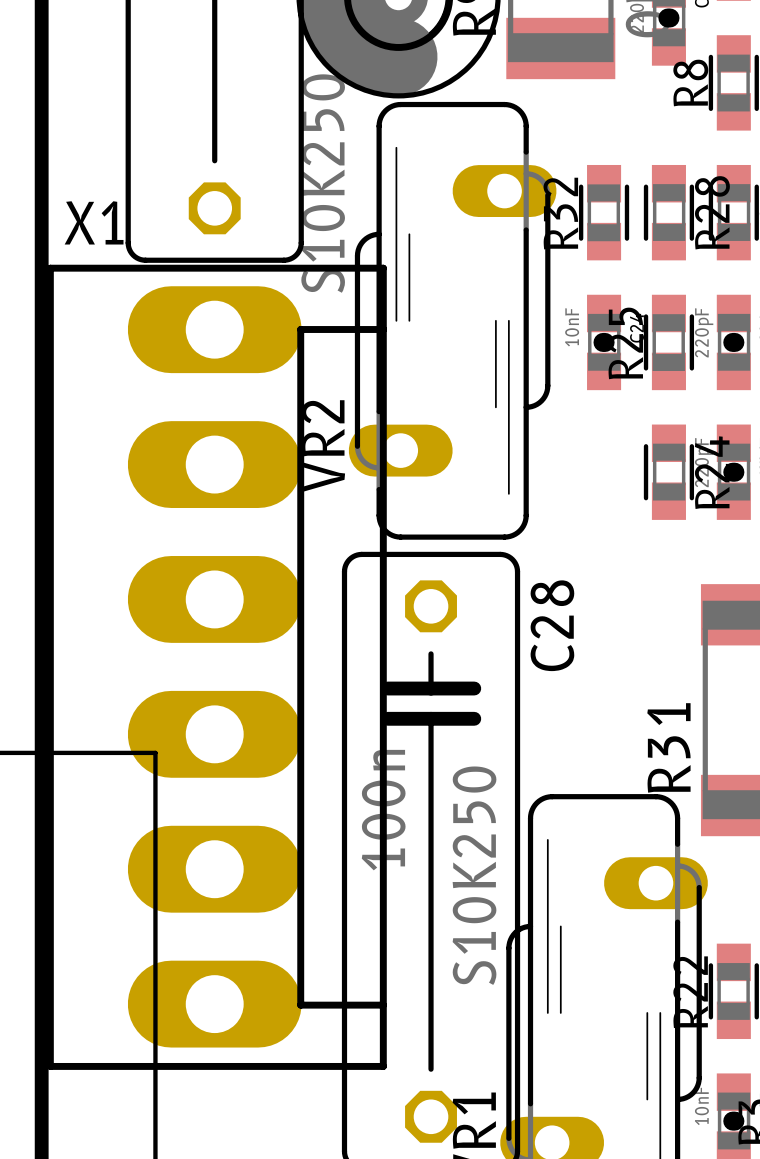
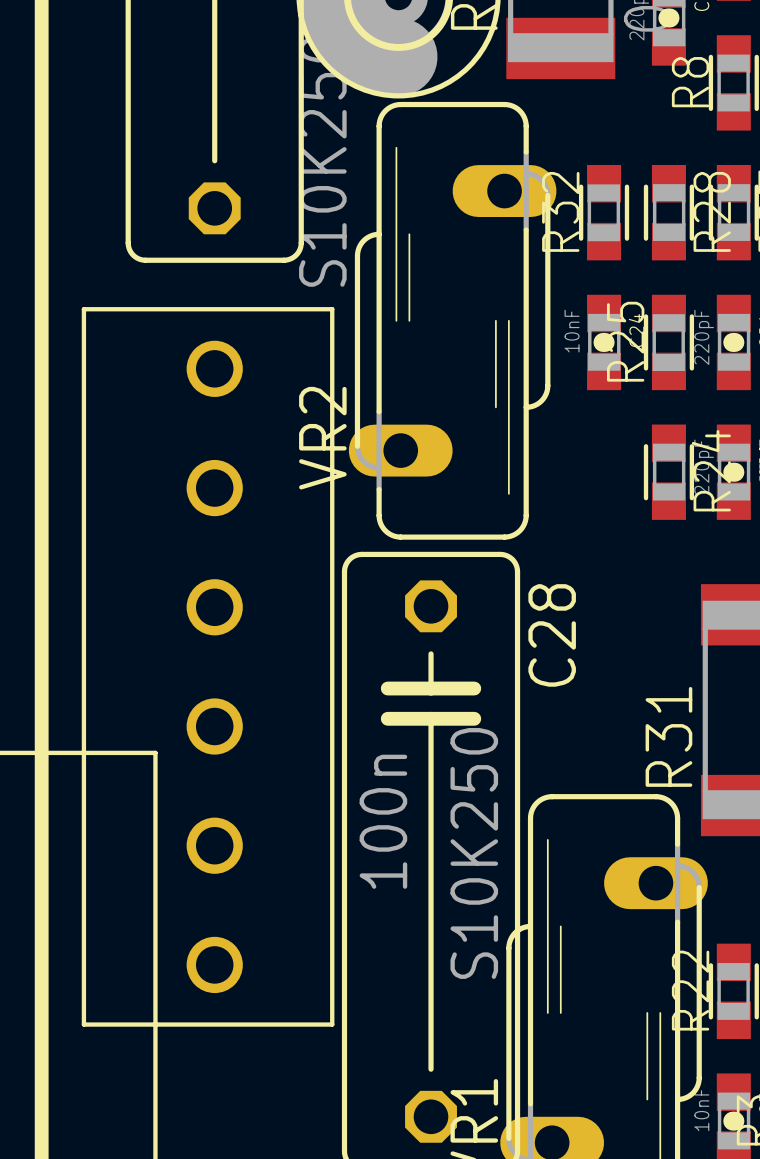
part: none -> (208, 666)
X1: (216, 667) -> none

